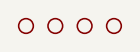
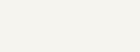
part: (25, 25) -> none
part: (55, 25) -> none
part: (84, 25) -> none
part: (113, 25) -> none

